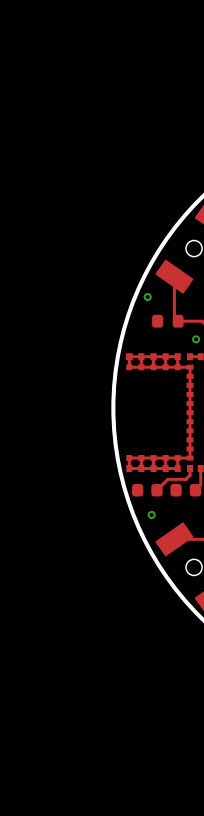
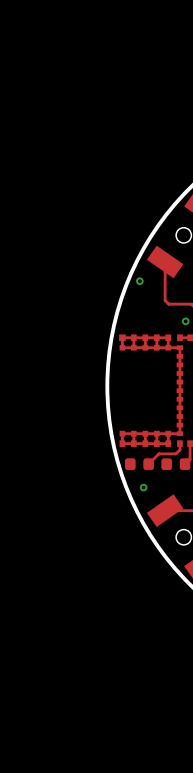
part: (167, 321) -> none

